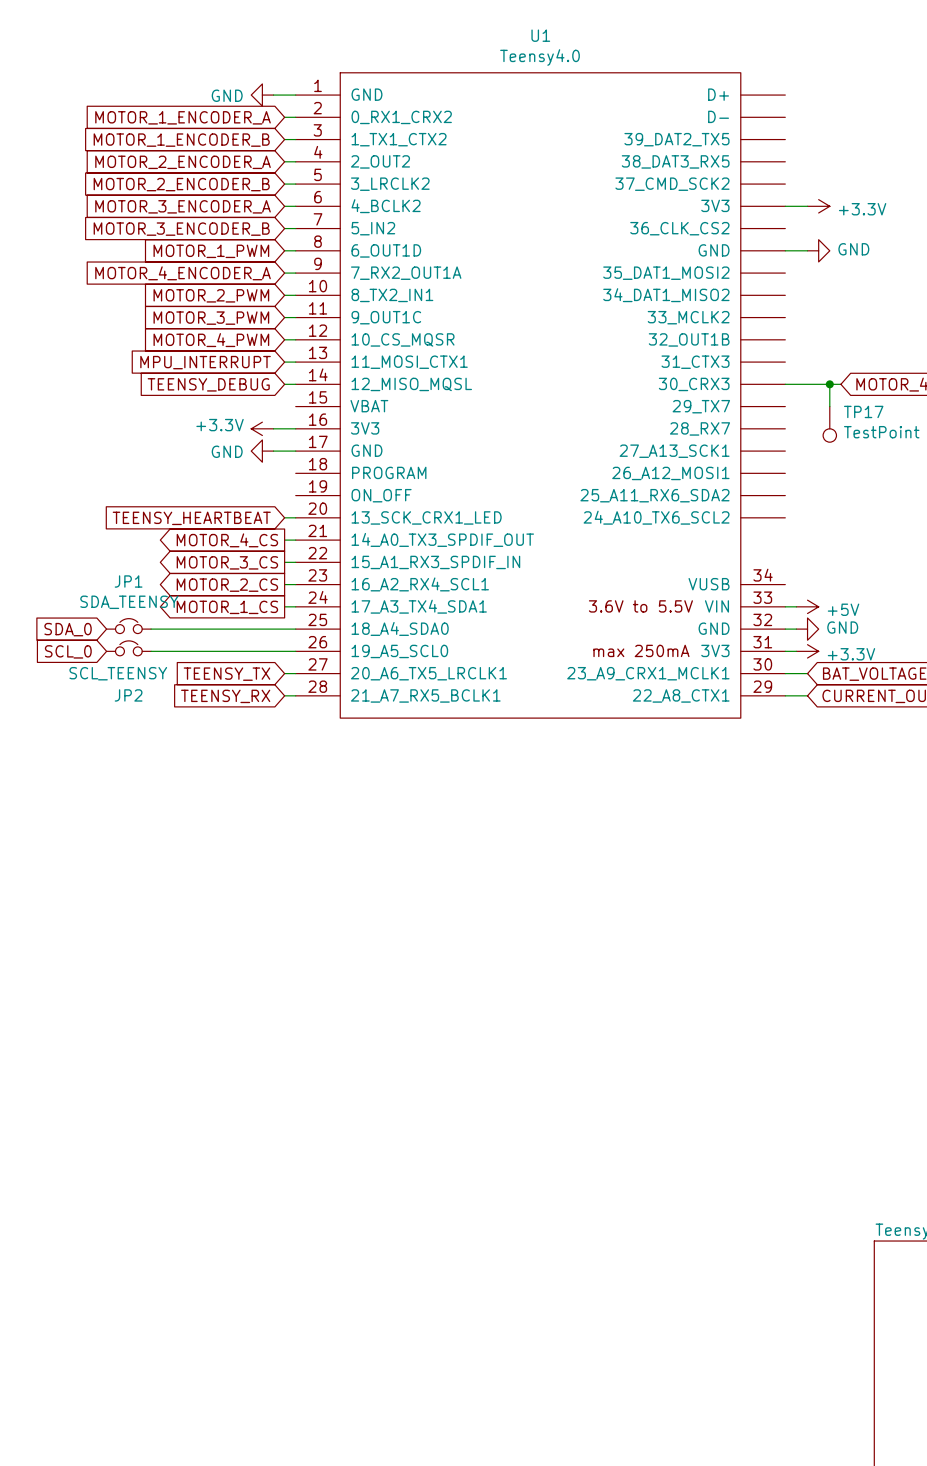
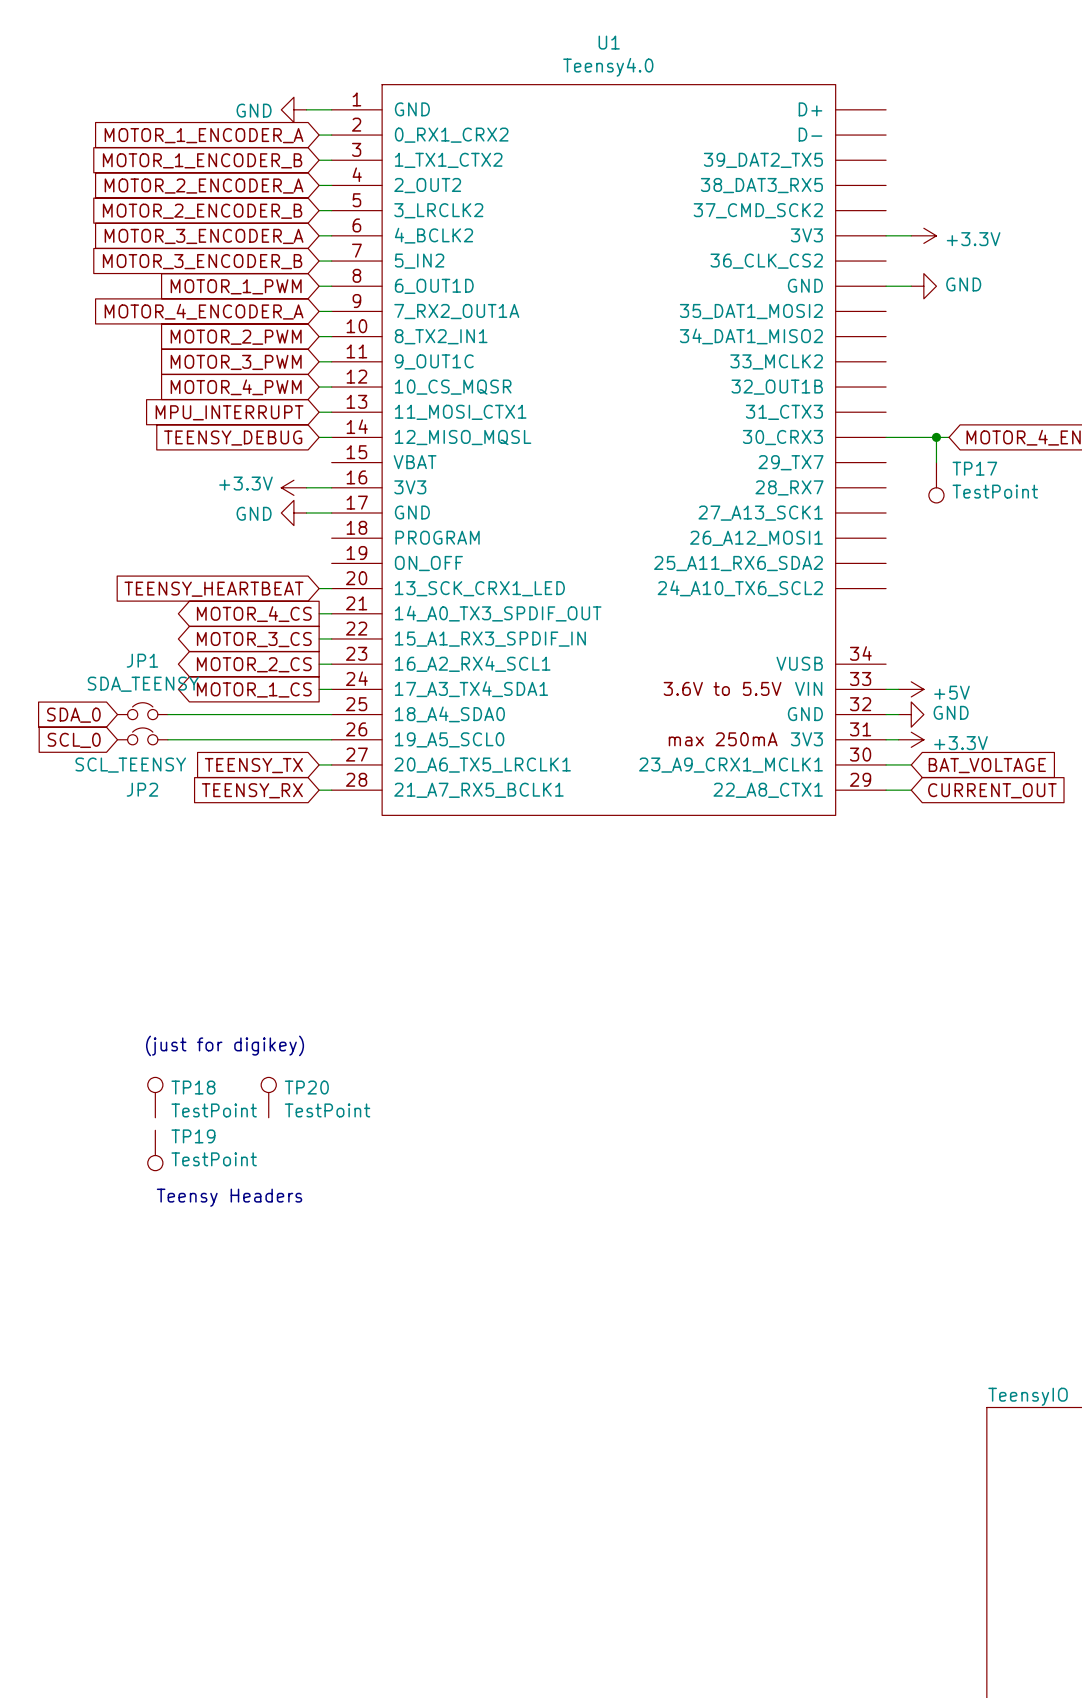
text: none -> (just for digikey) (225, 1045)
TP18: none -> TestPoint (155, 1097)
TP20: none -> TestPoint (268, 1097)
TP19: none -> TestPoint (155, 1150)
text: none -> Teensy Headers (229, 1197)

